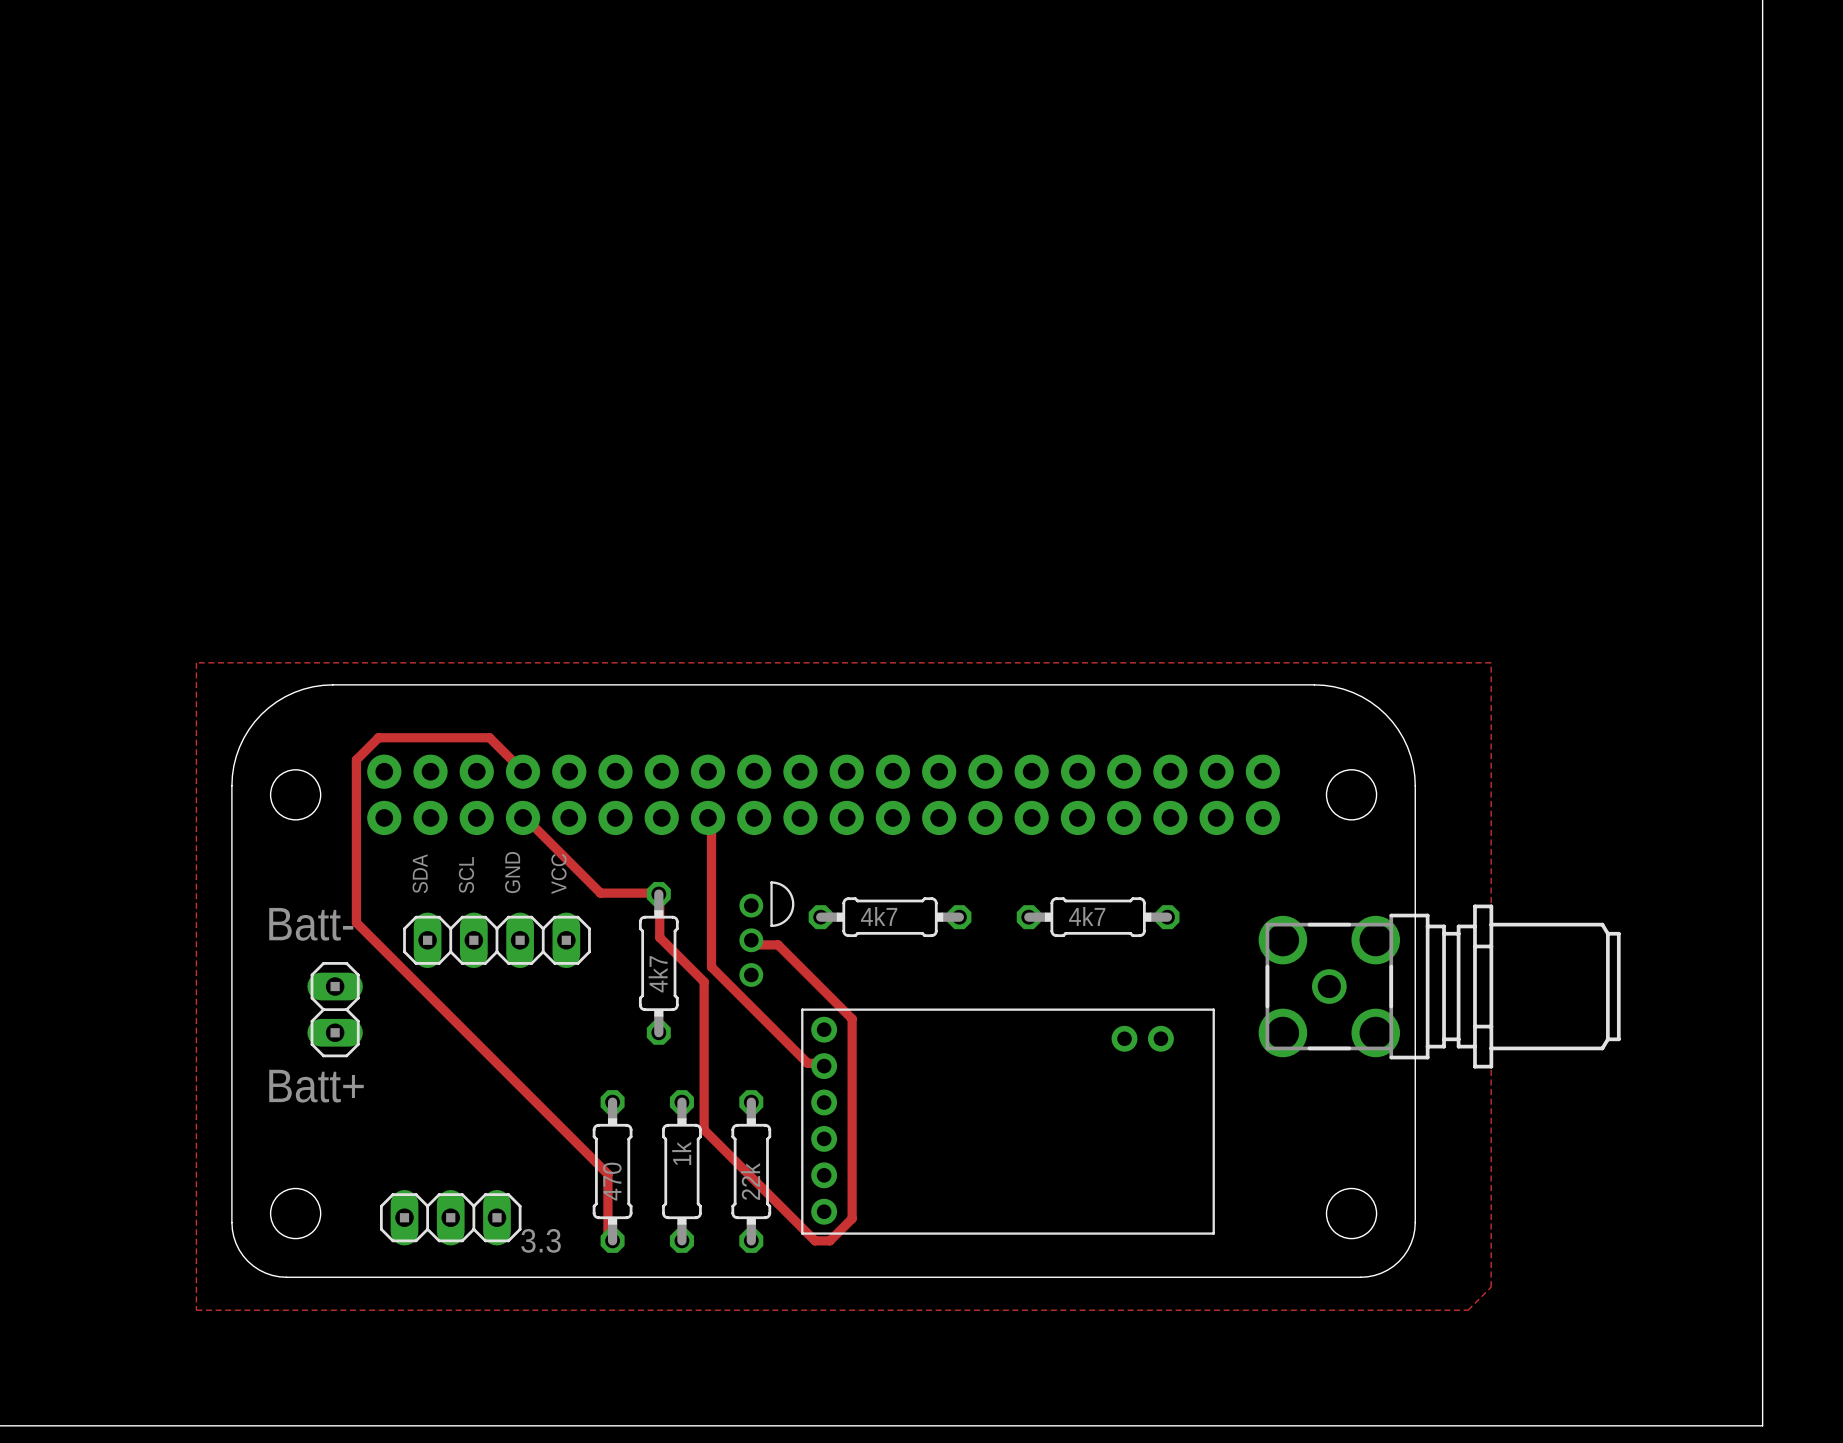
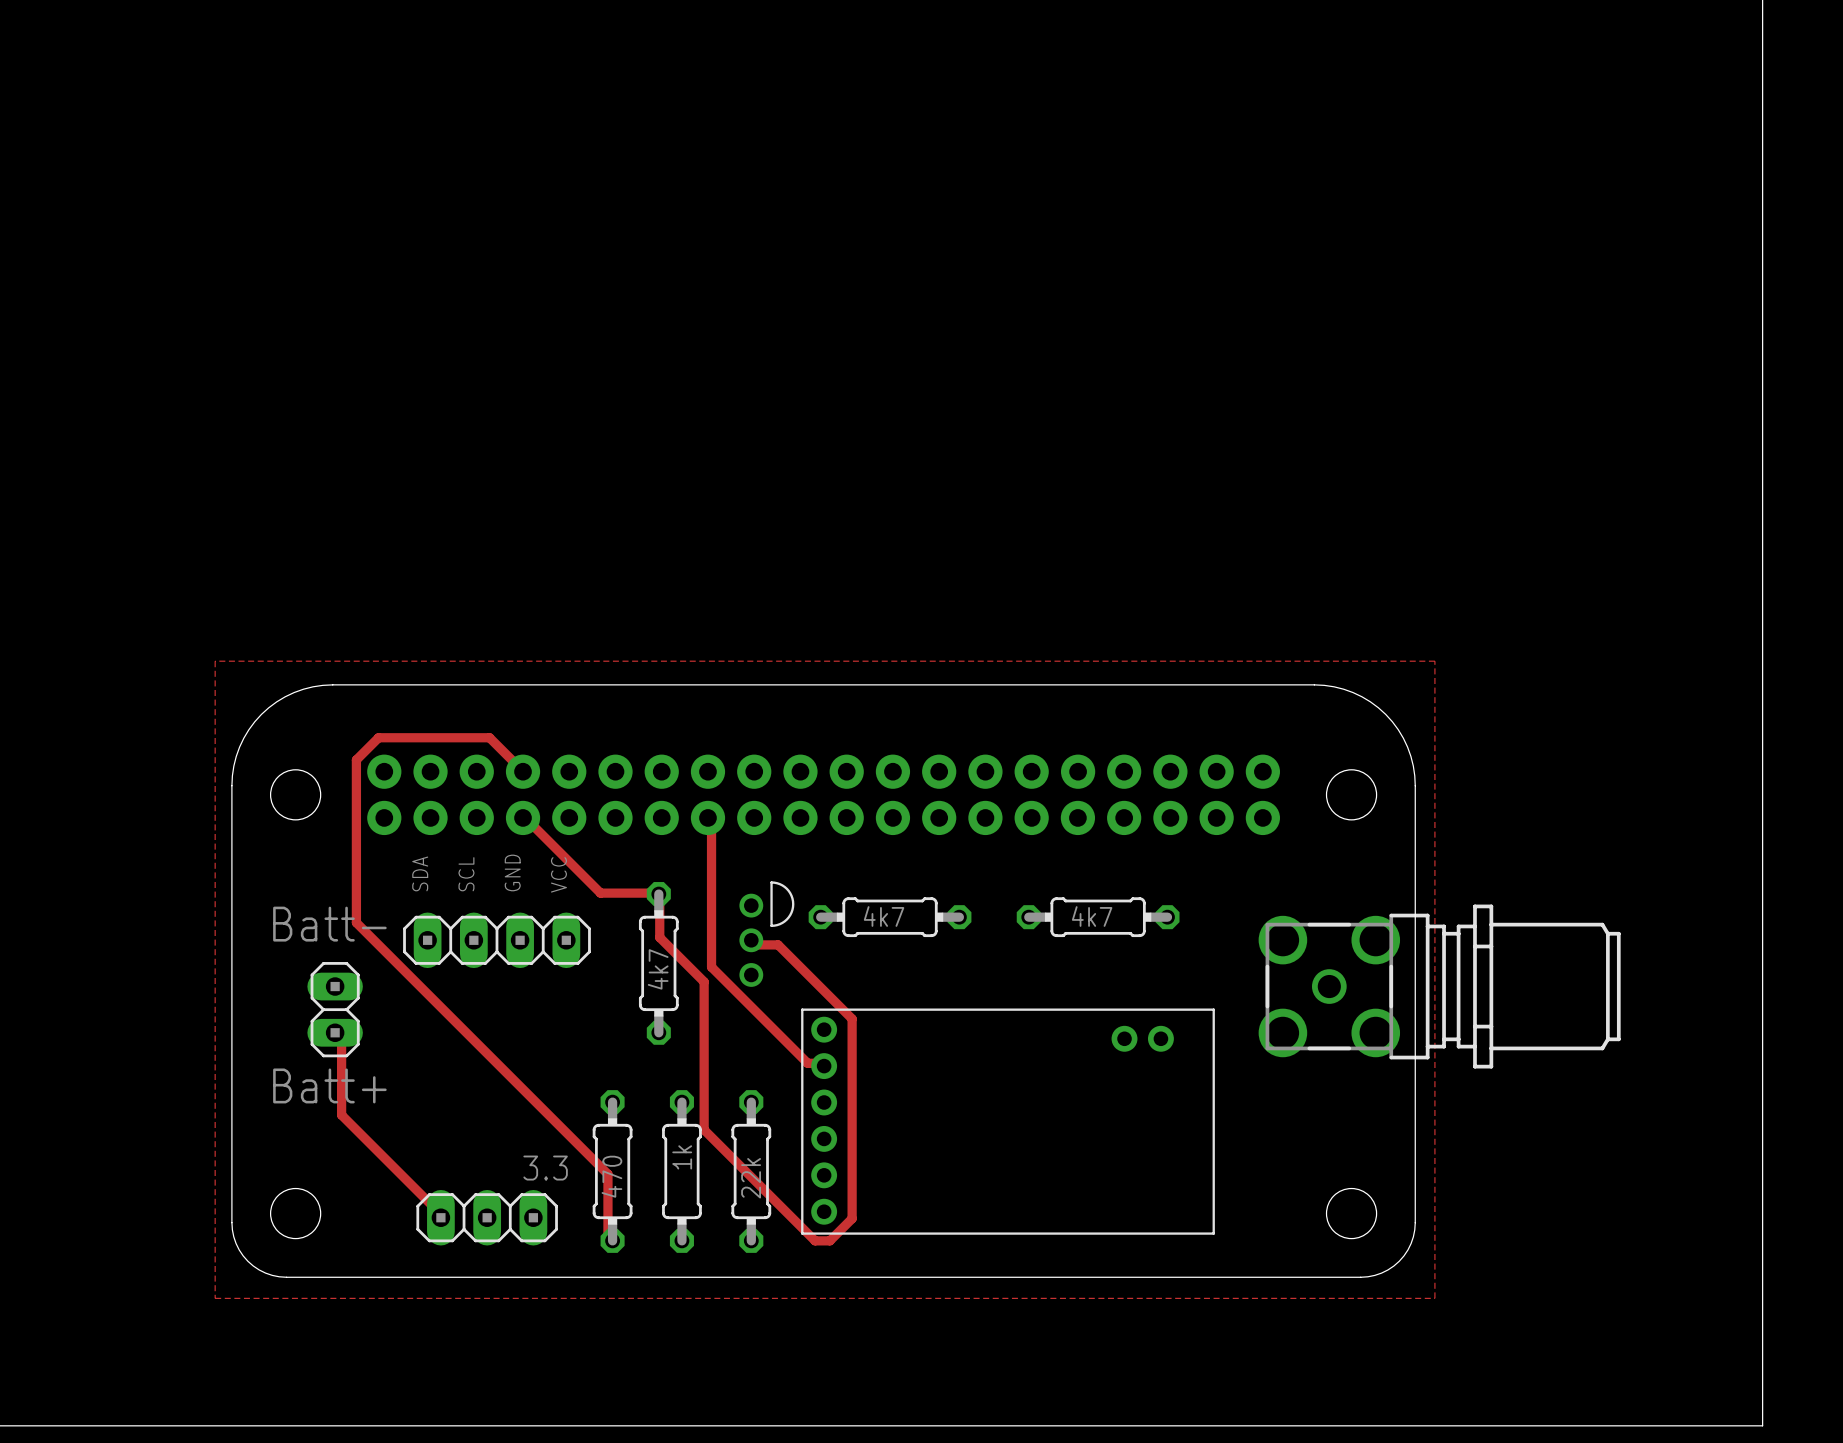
zone outline: (196, 662) (196, 1310) (1468, 1310) (1491, 1287) (1491, 662) (196, 662) -> (215, 661) (215, 1298) (1434, 1298) (1434, 661) (215, 661)
track: none -> (335, 1032) (341, 1033) (341, 1115) (437, 1211) (440, 1217)
part position: (450, 1217) -> (487, 1217)
part value position: 3.3 (541, 1240) -> 3.3 (545, 1168)

